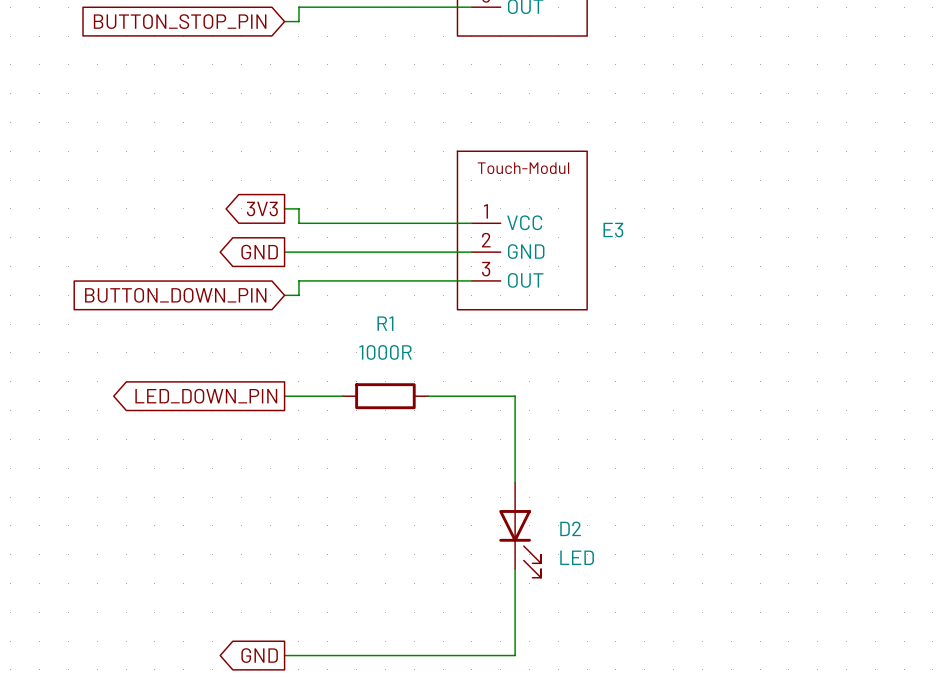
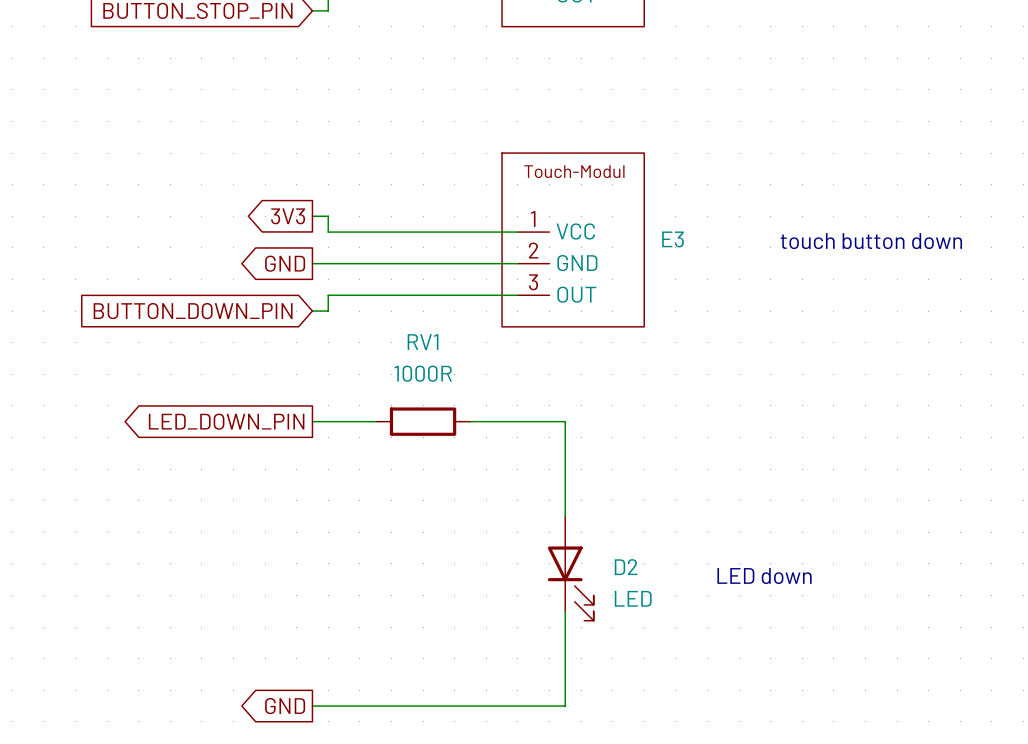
text: none -> touch button down (871, 241)
R1 name: R1 (385, 323) -> RV1 (423, 342)
text: none -> LED down (764, 576)

